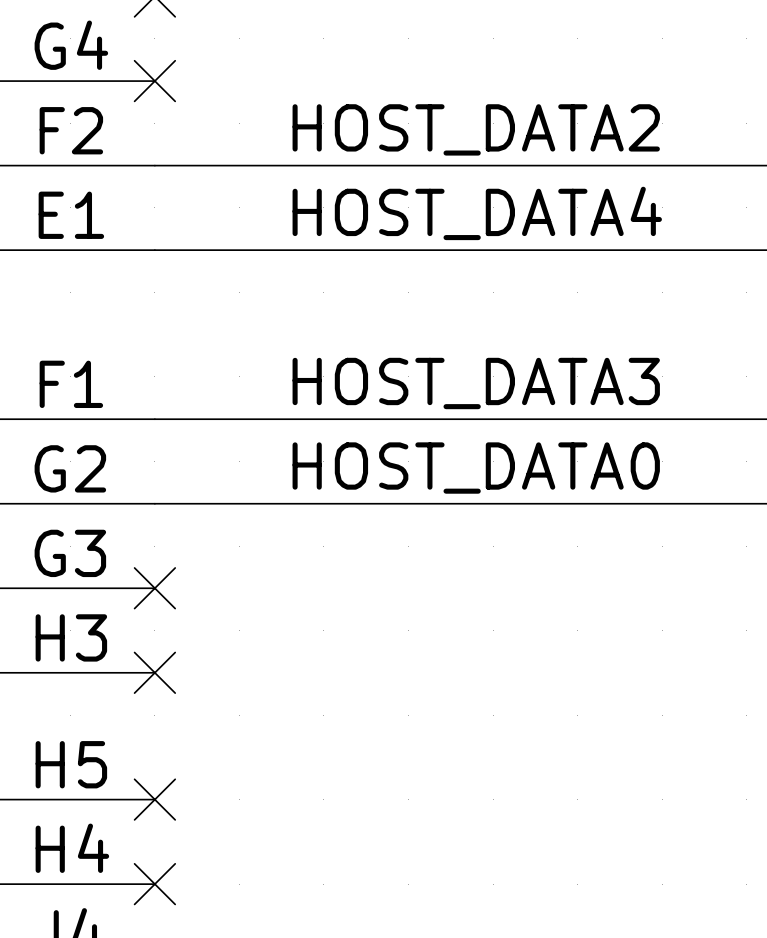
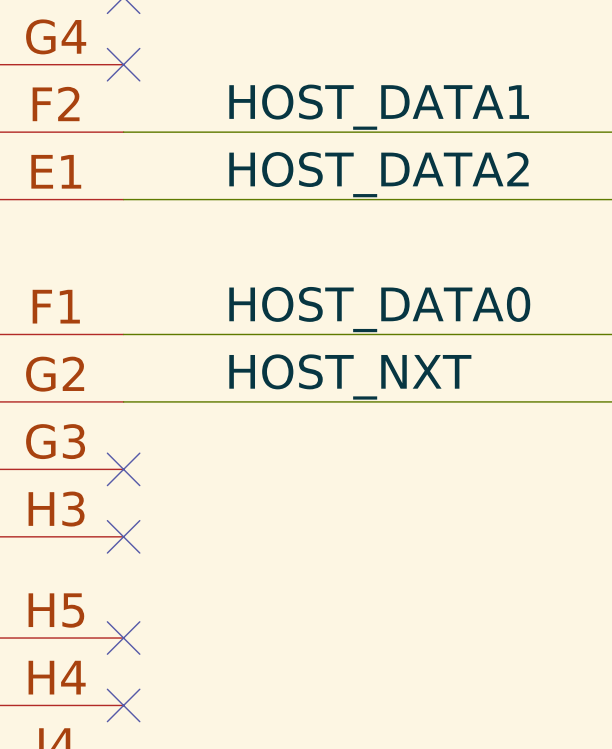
label: HOST_DATA2 (476, 129) -> HOST_DATA1 (379, 107)
label: HOST_DATA4 (477, 213) -> HOST_DATA2 (378, 174)
label: HOST_DATA3 (476, 383) -> HOST_DATA0 (379, 309)
label: HOST_DATA0 (476, 468) -> HOST_NXT (350, 376)

